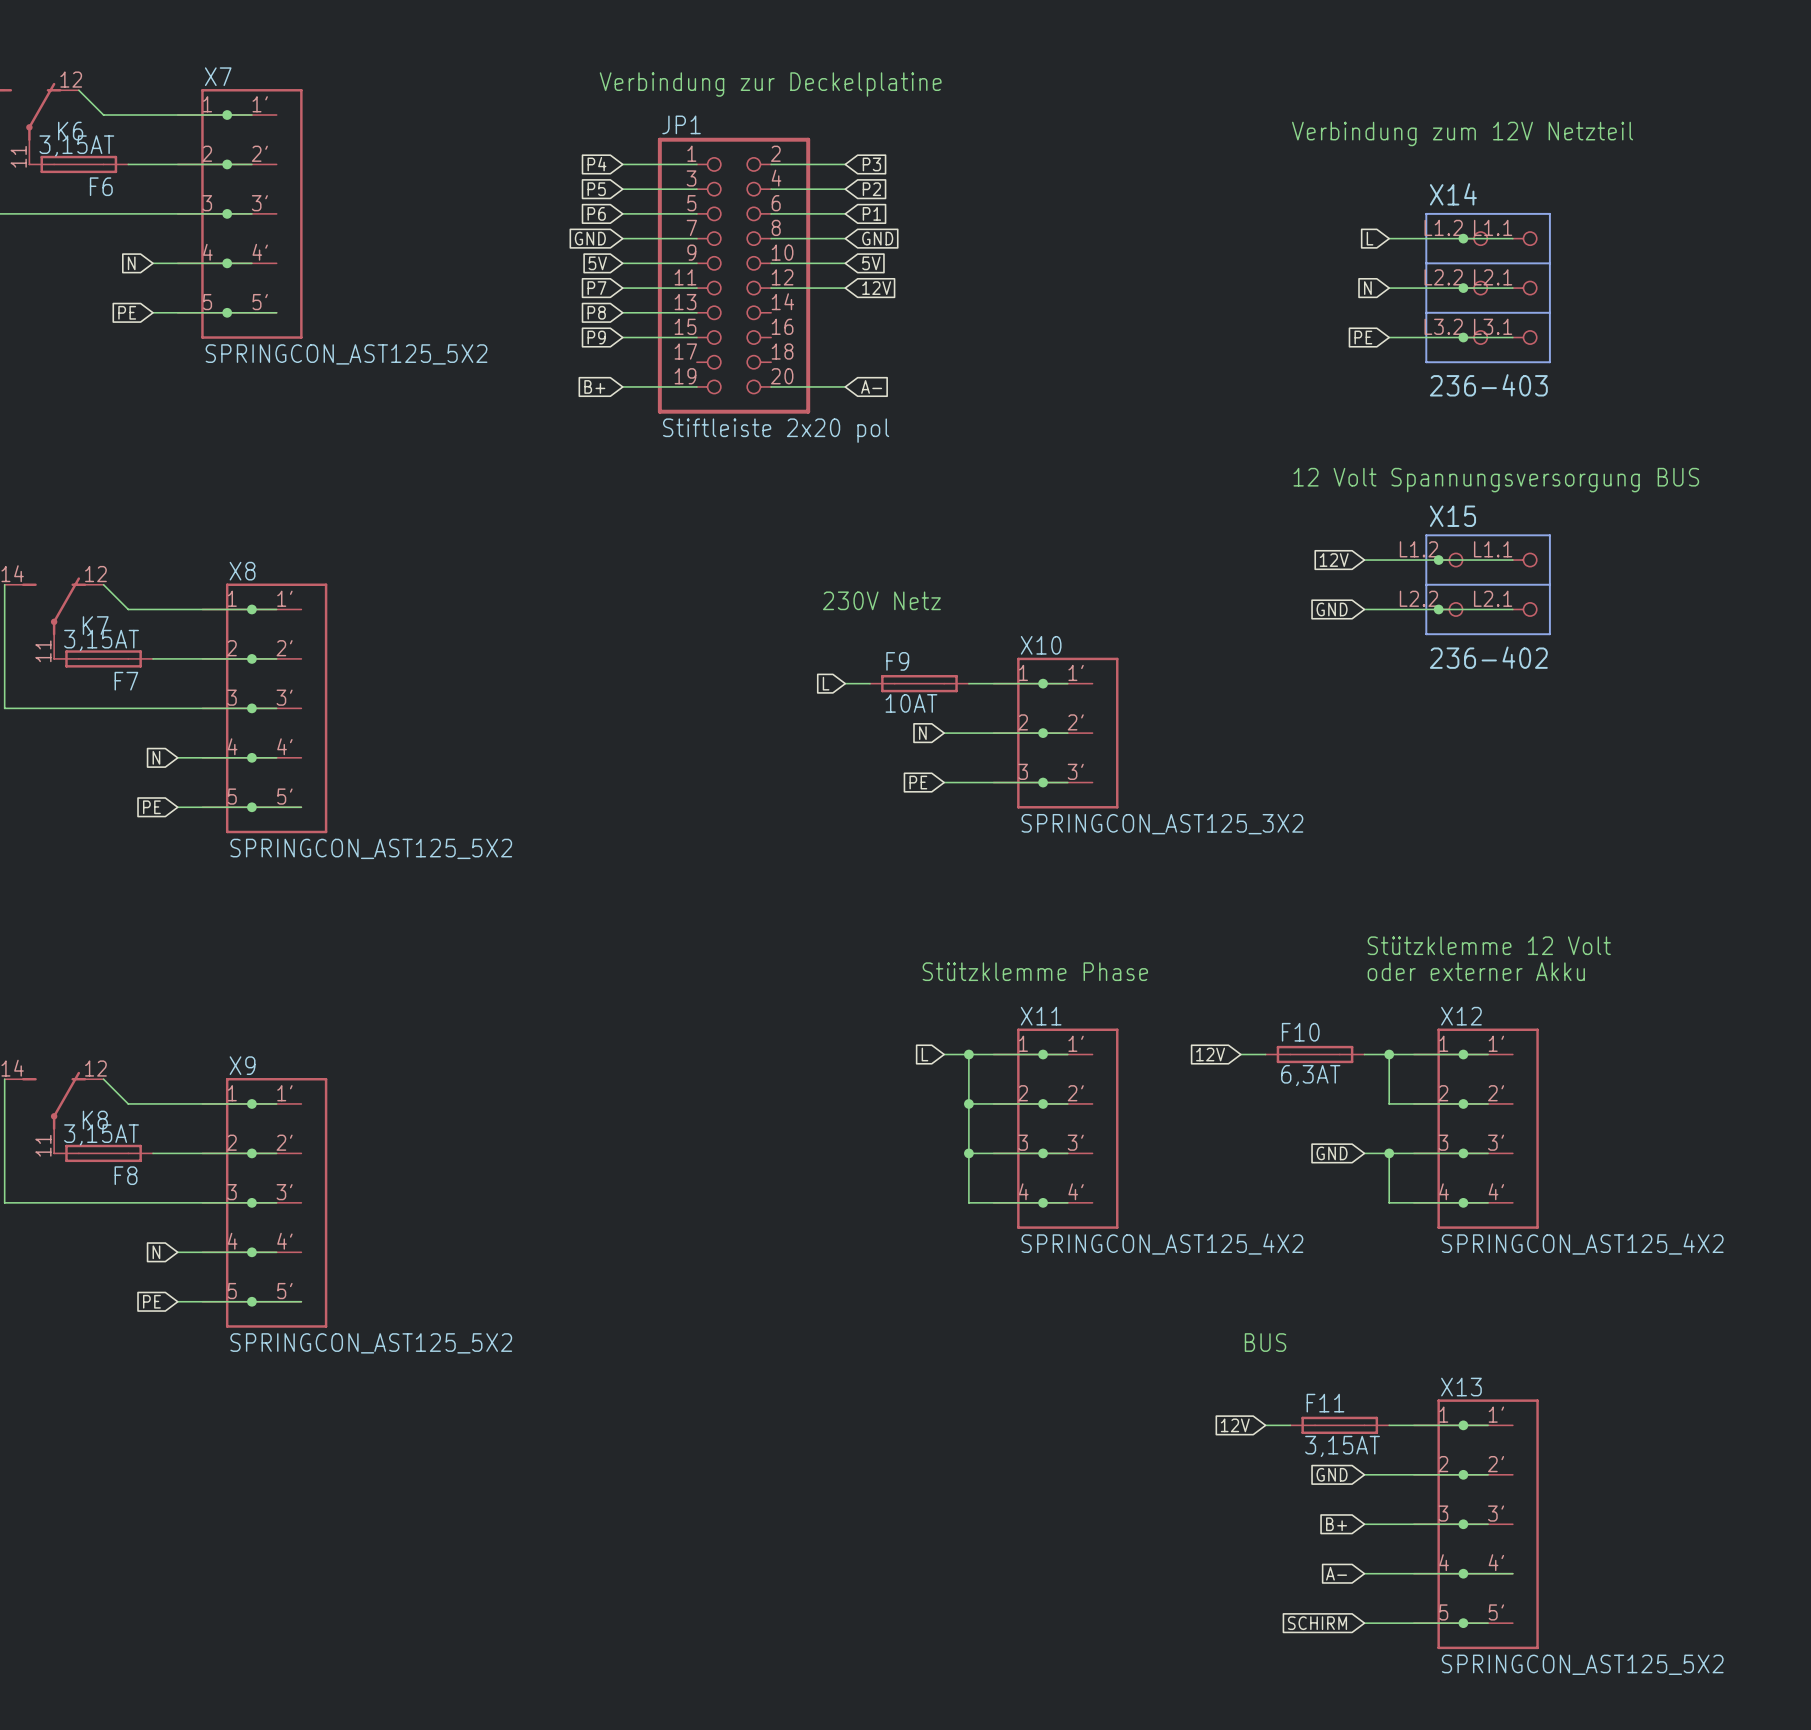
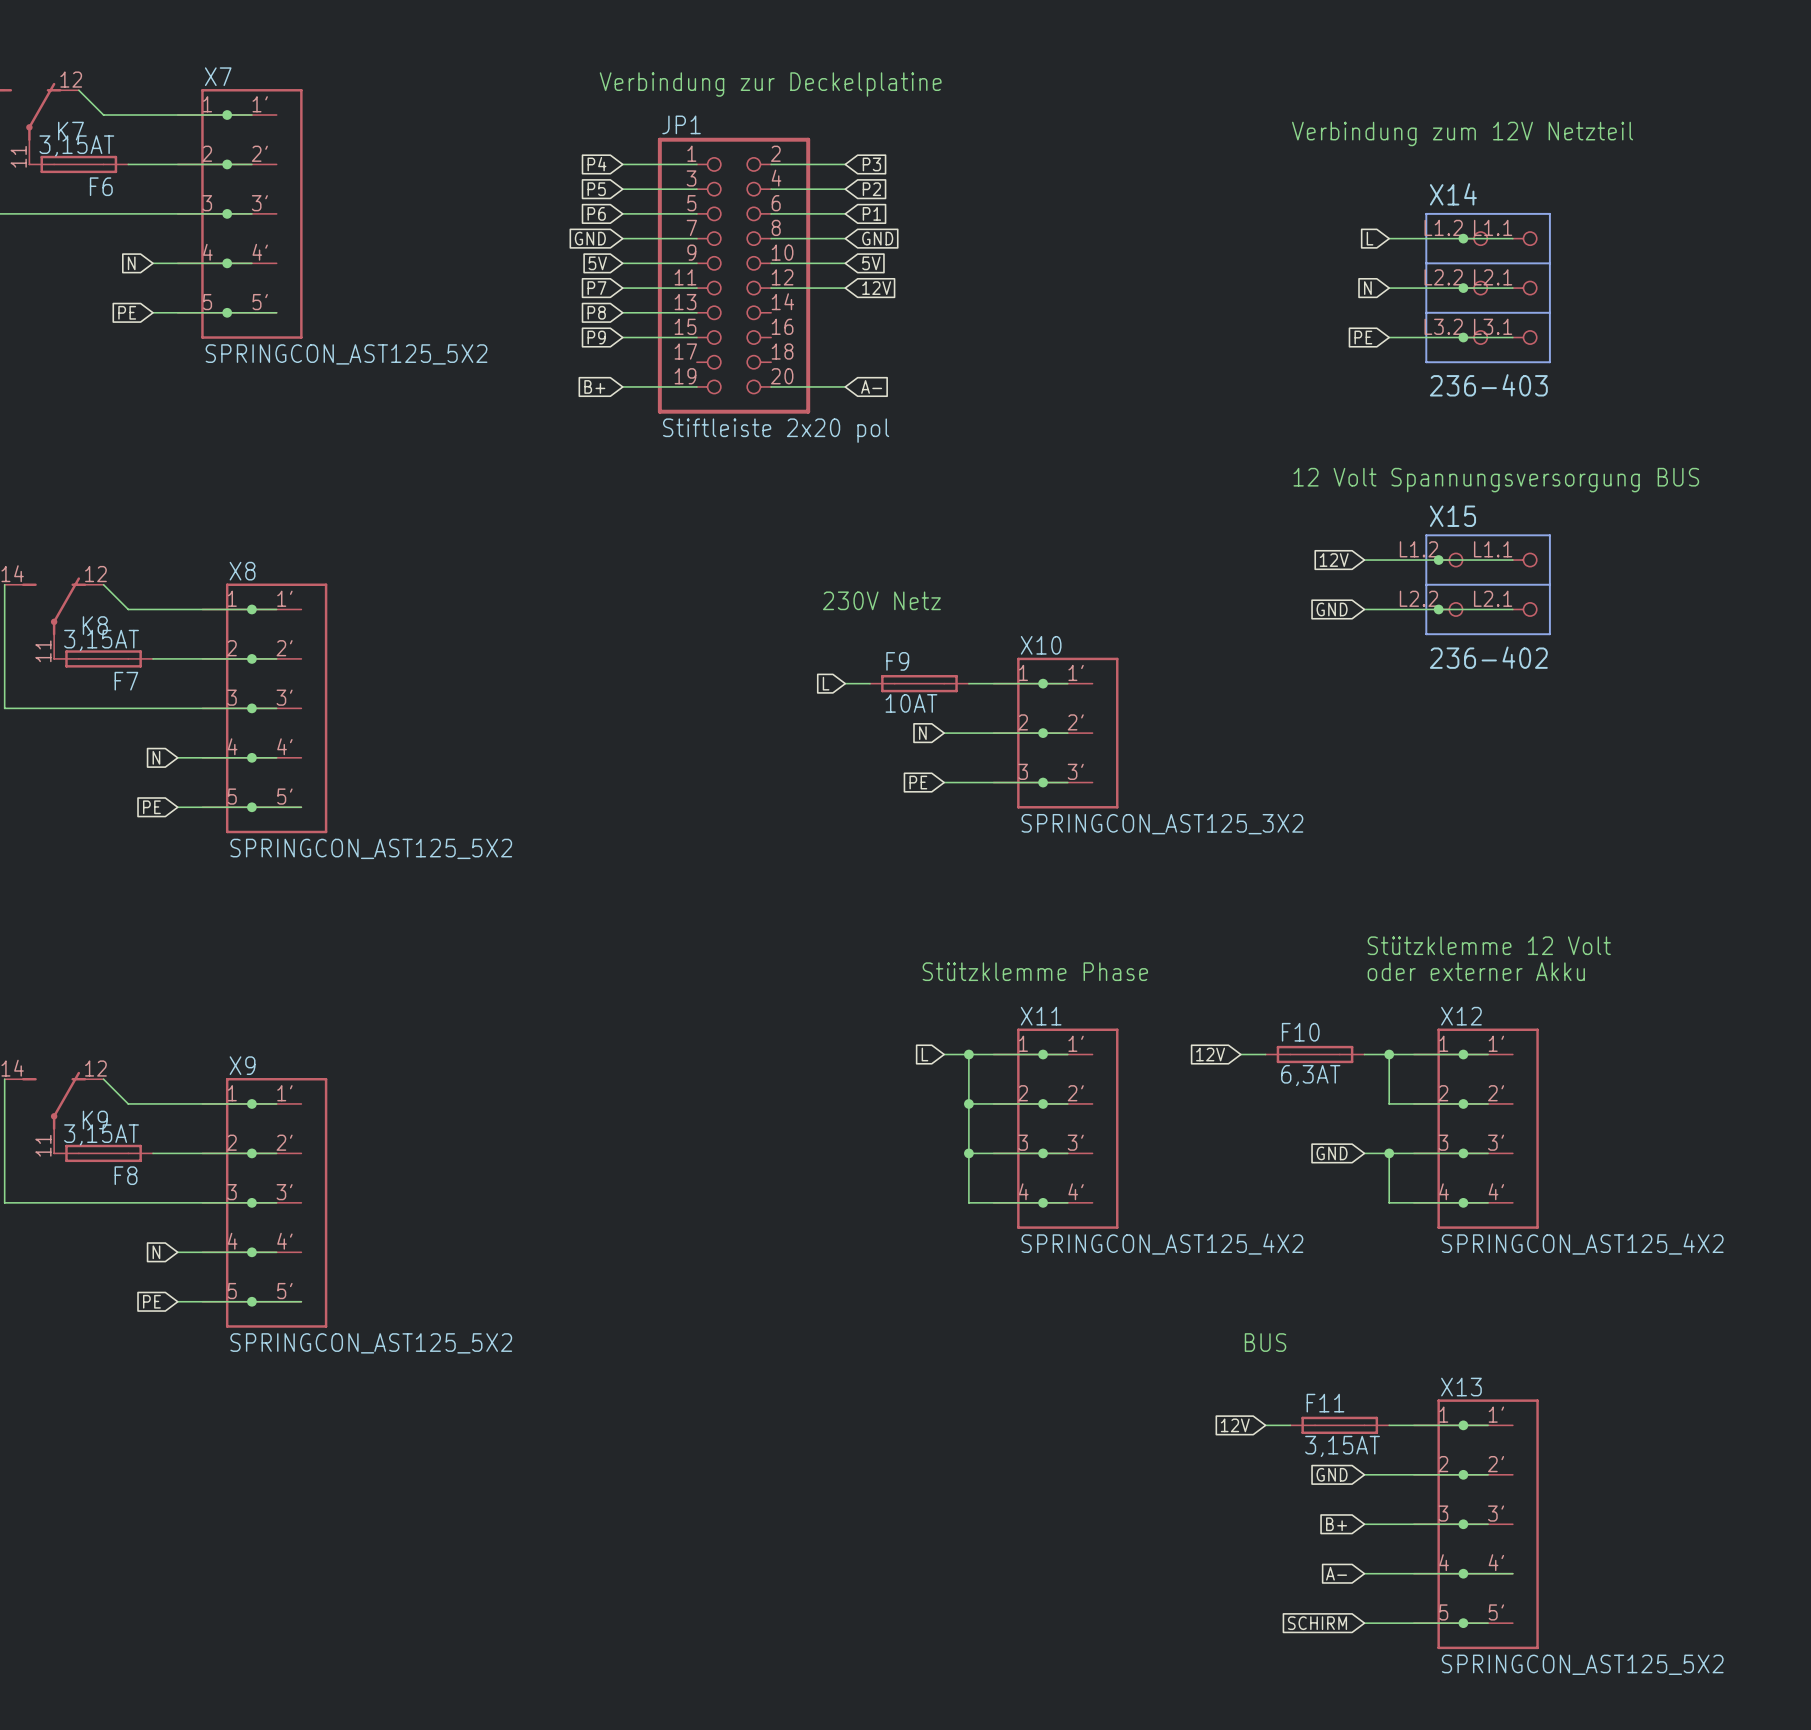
K6 name: K6 (70, 131) -> K7 (70, 131)
K7 name: K7 (95, 625) -> K8 (95, 625)
K8 name: K8 (95, 1120) -> K9 (95, 1120)

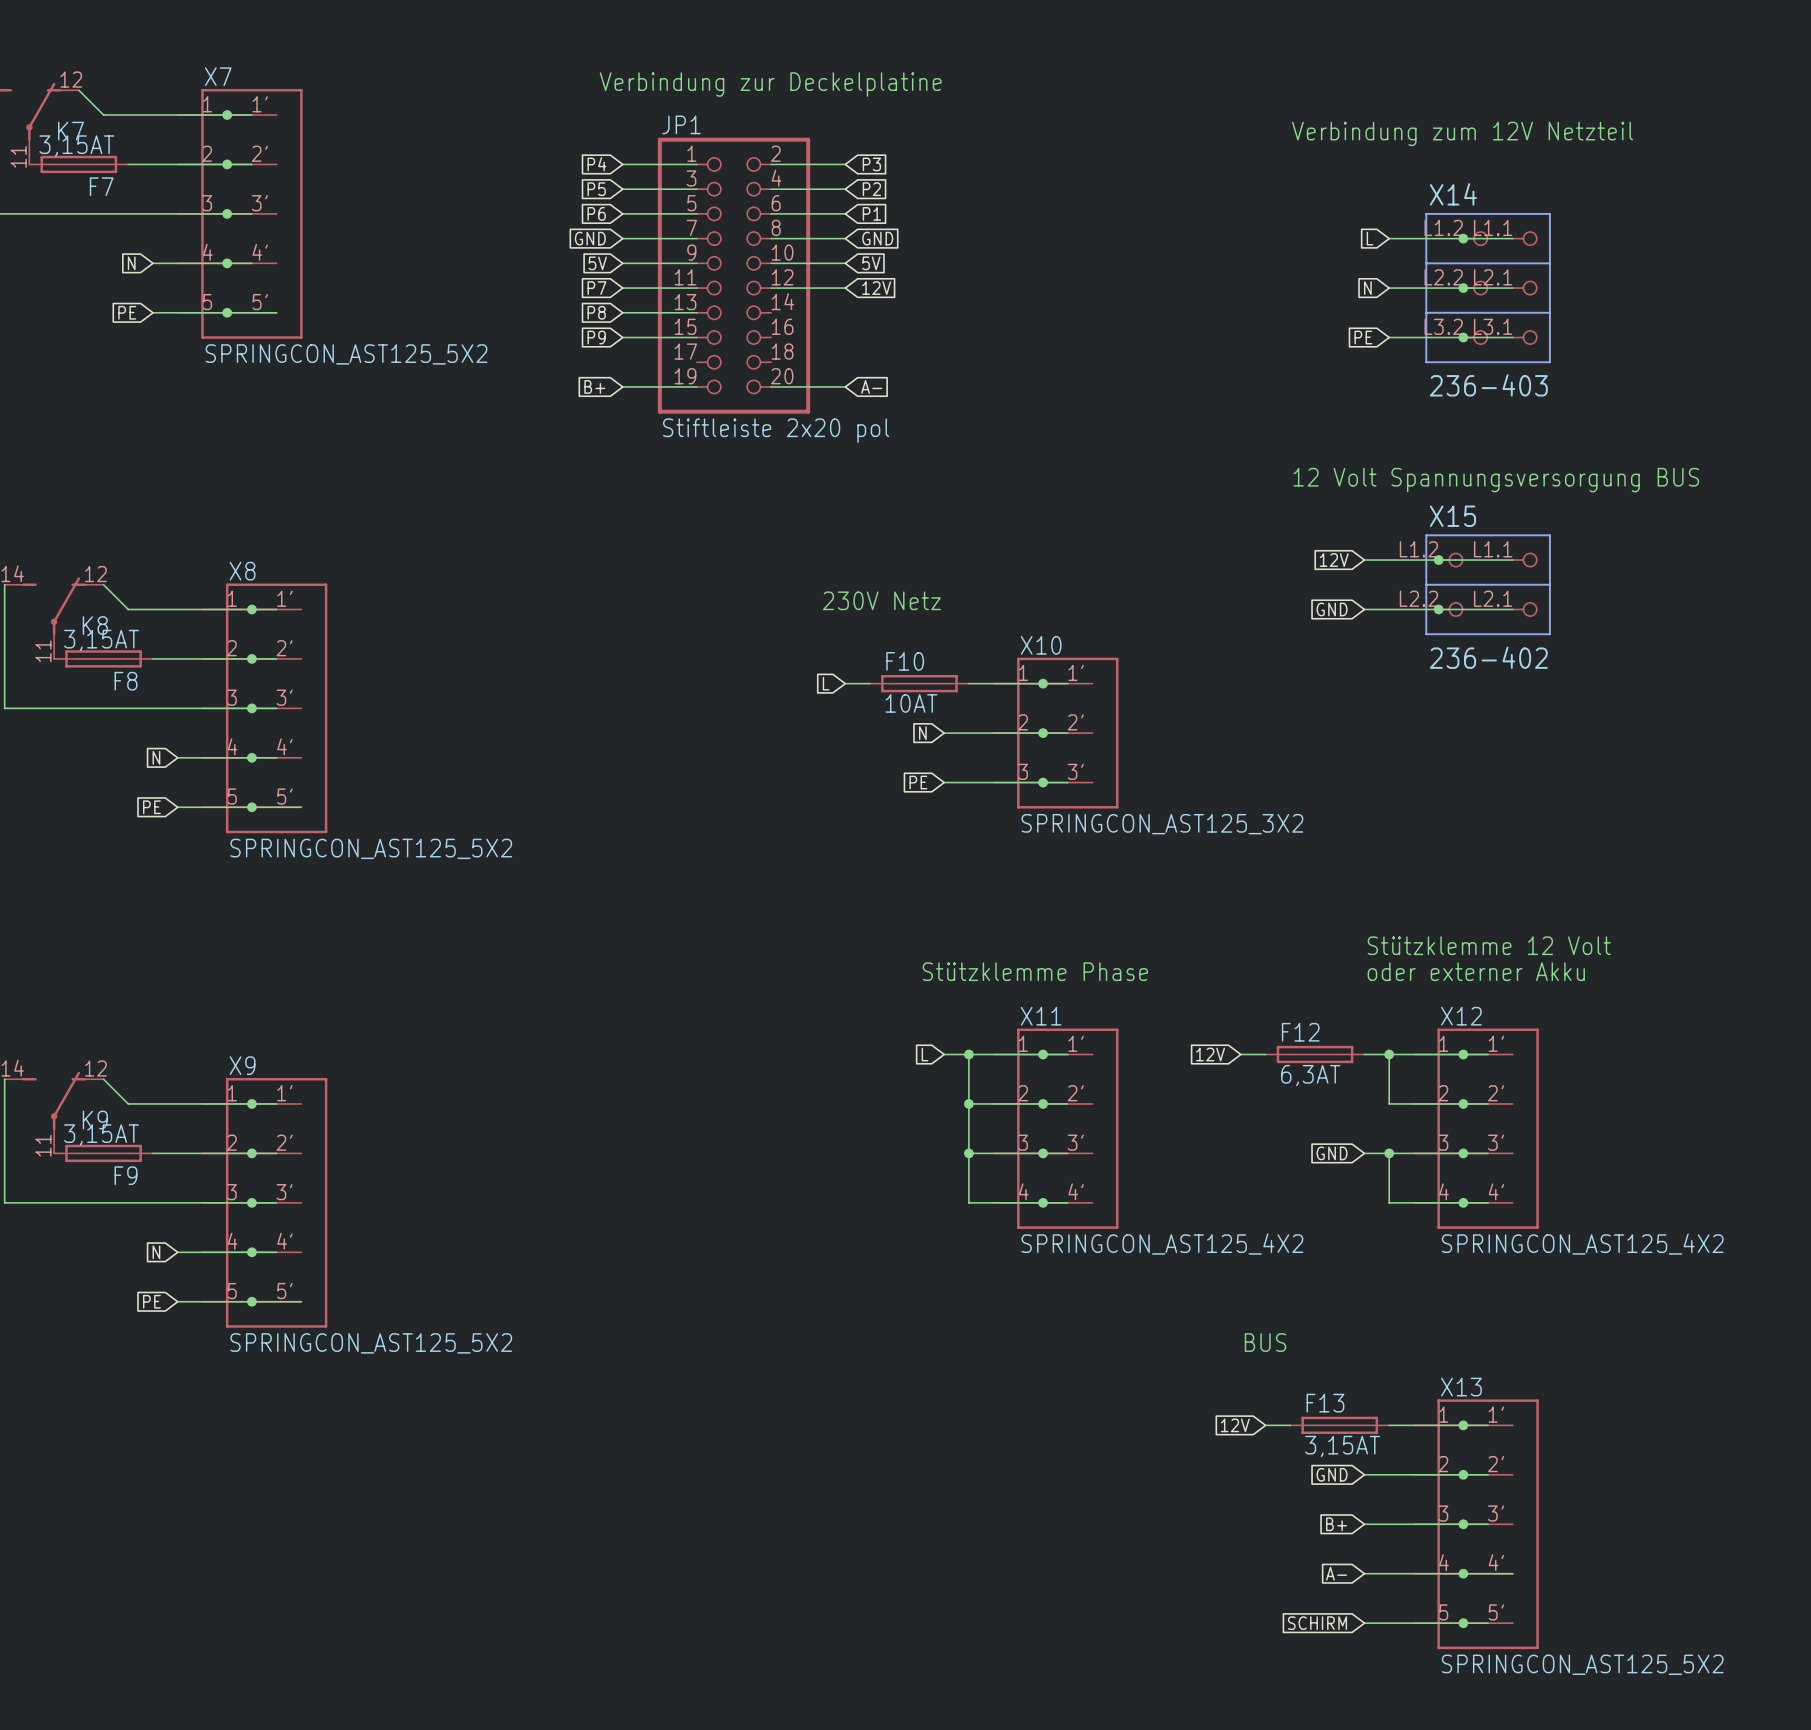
F6 name: F6 (101, 186) -> F7 (101, 186)
F9 name: F9 (897, 661) -> F10 (905, 661)
F7 name: F7 (126, 681) -> F8 (126, 681)
F10 name: F10 (1300, 1032) -> F12 (1300, 1032)
F8 name: F8 (126, 1175) -> F9 (126, 1175)
F11 name: F11 (1325, 1403) -> F13 (1325, 1403)

